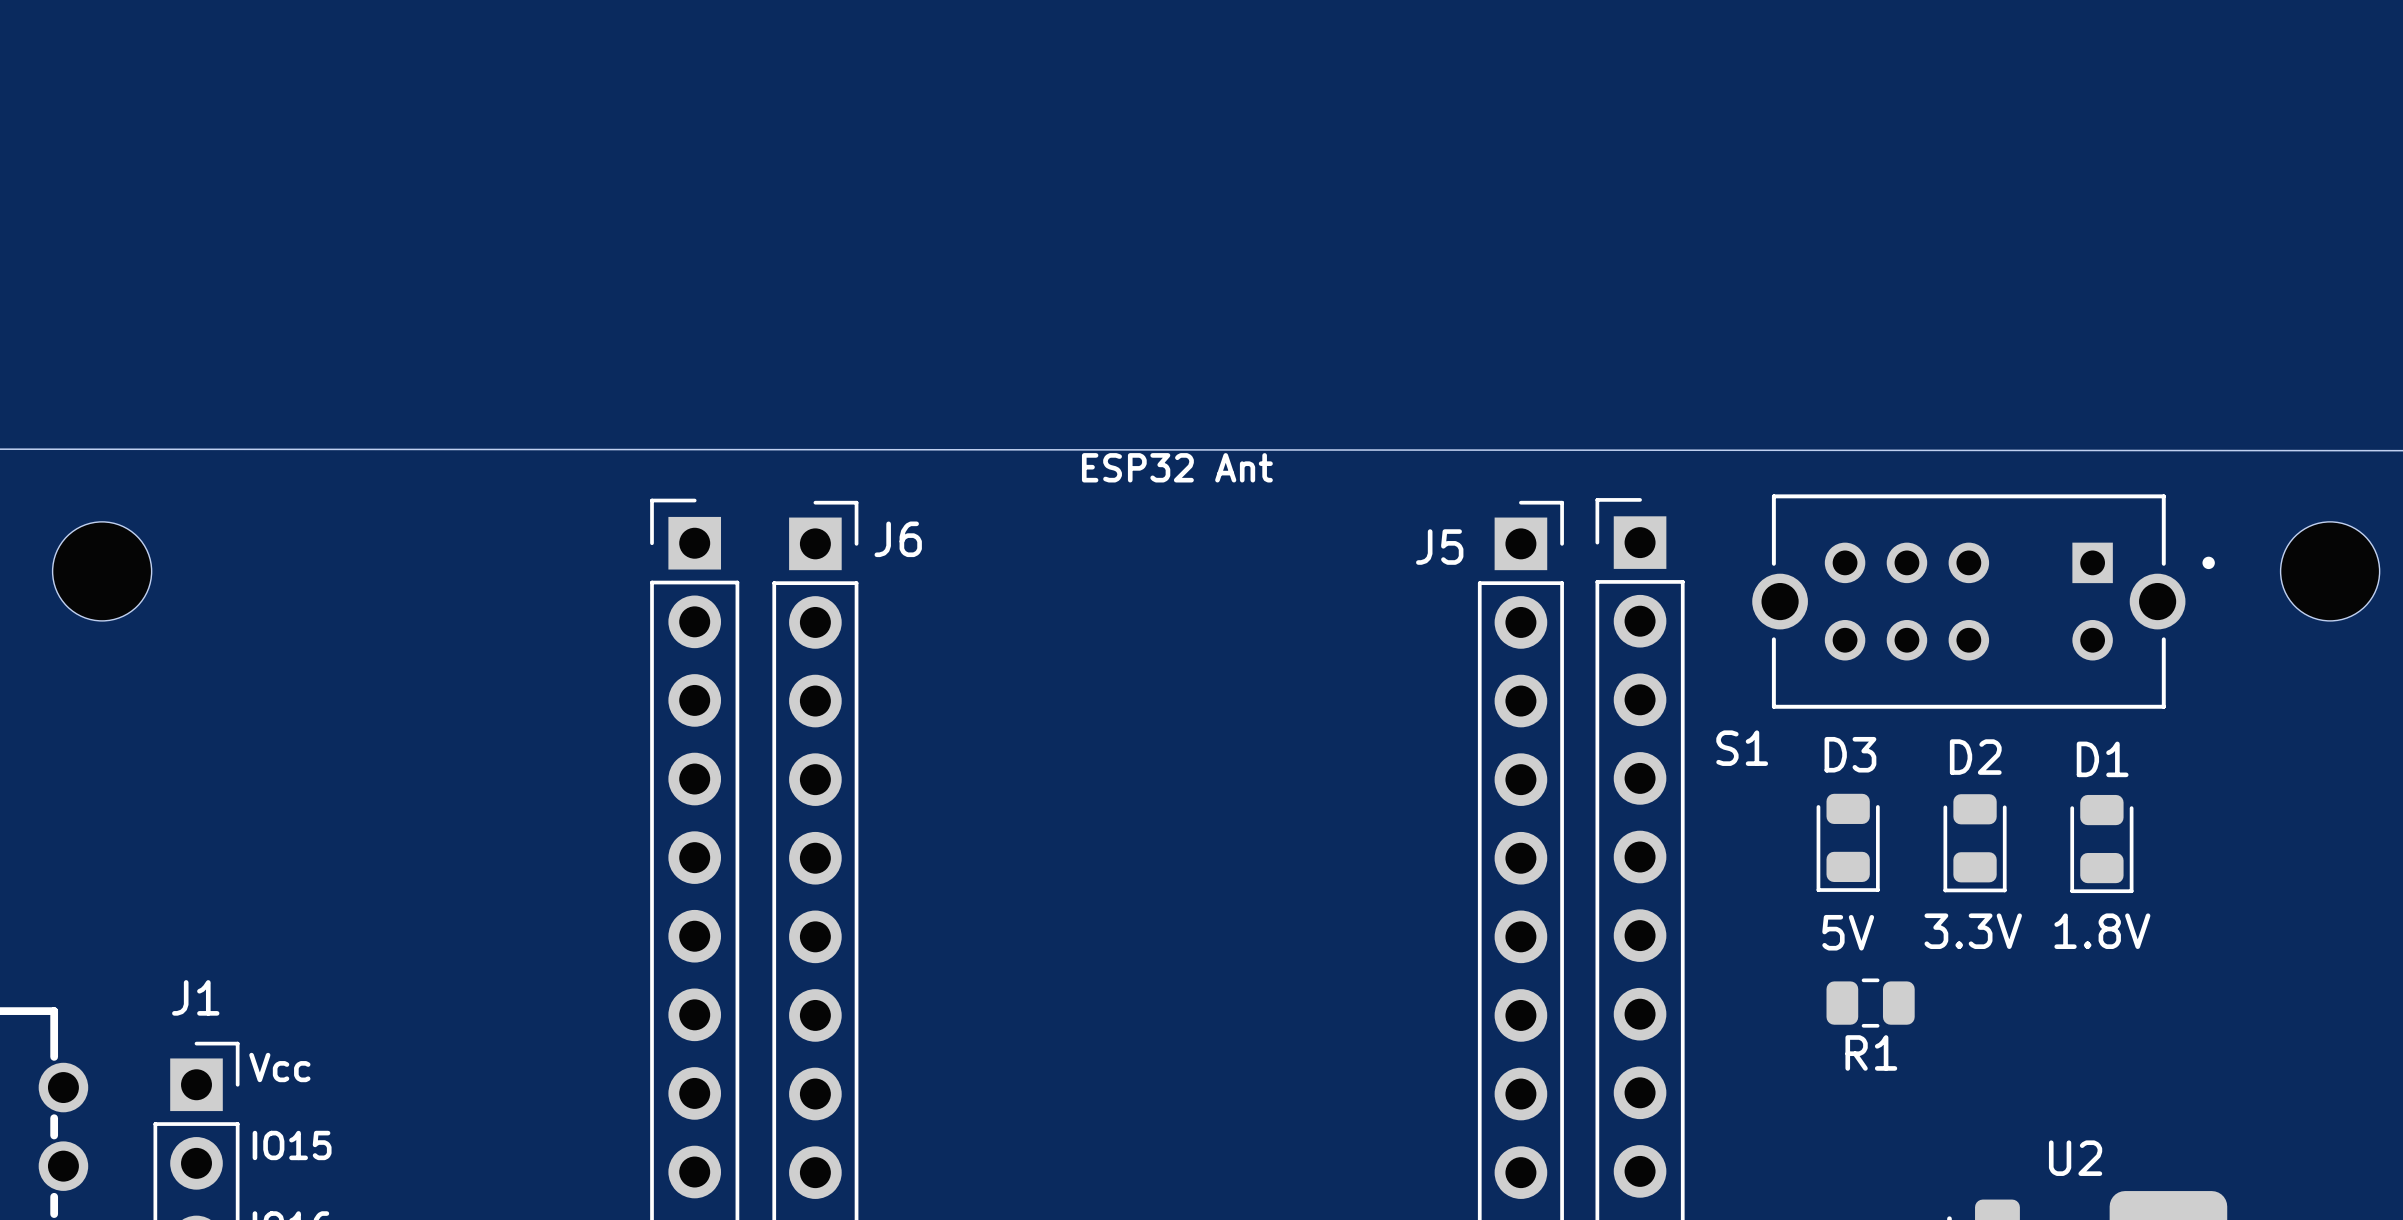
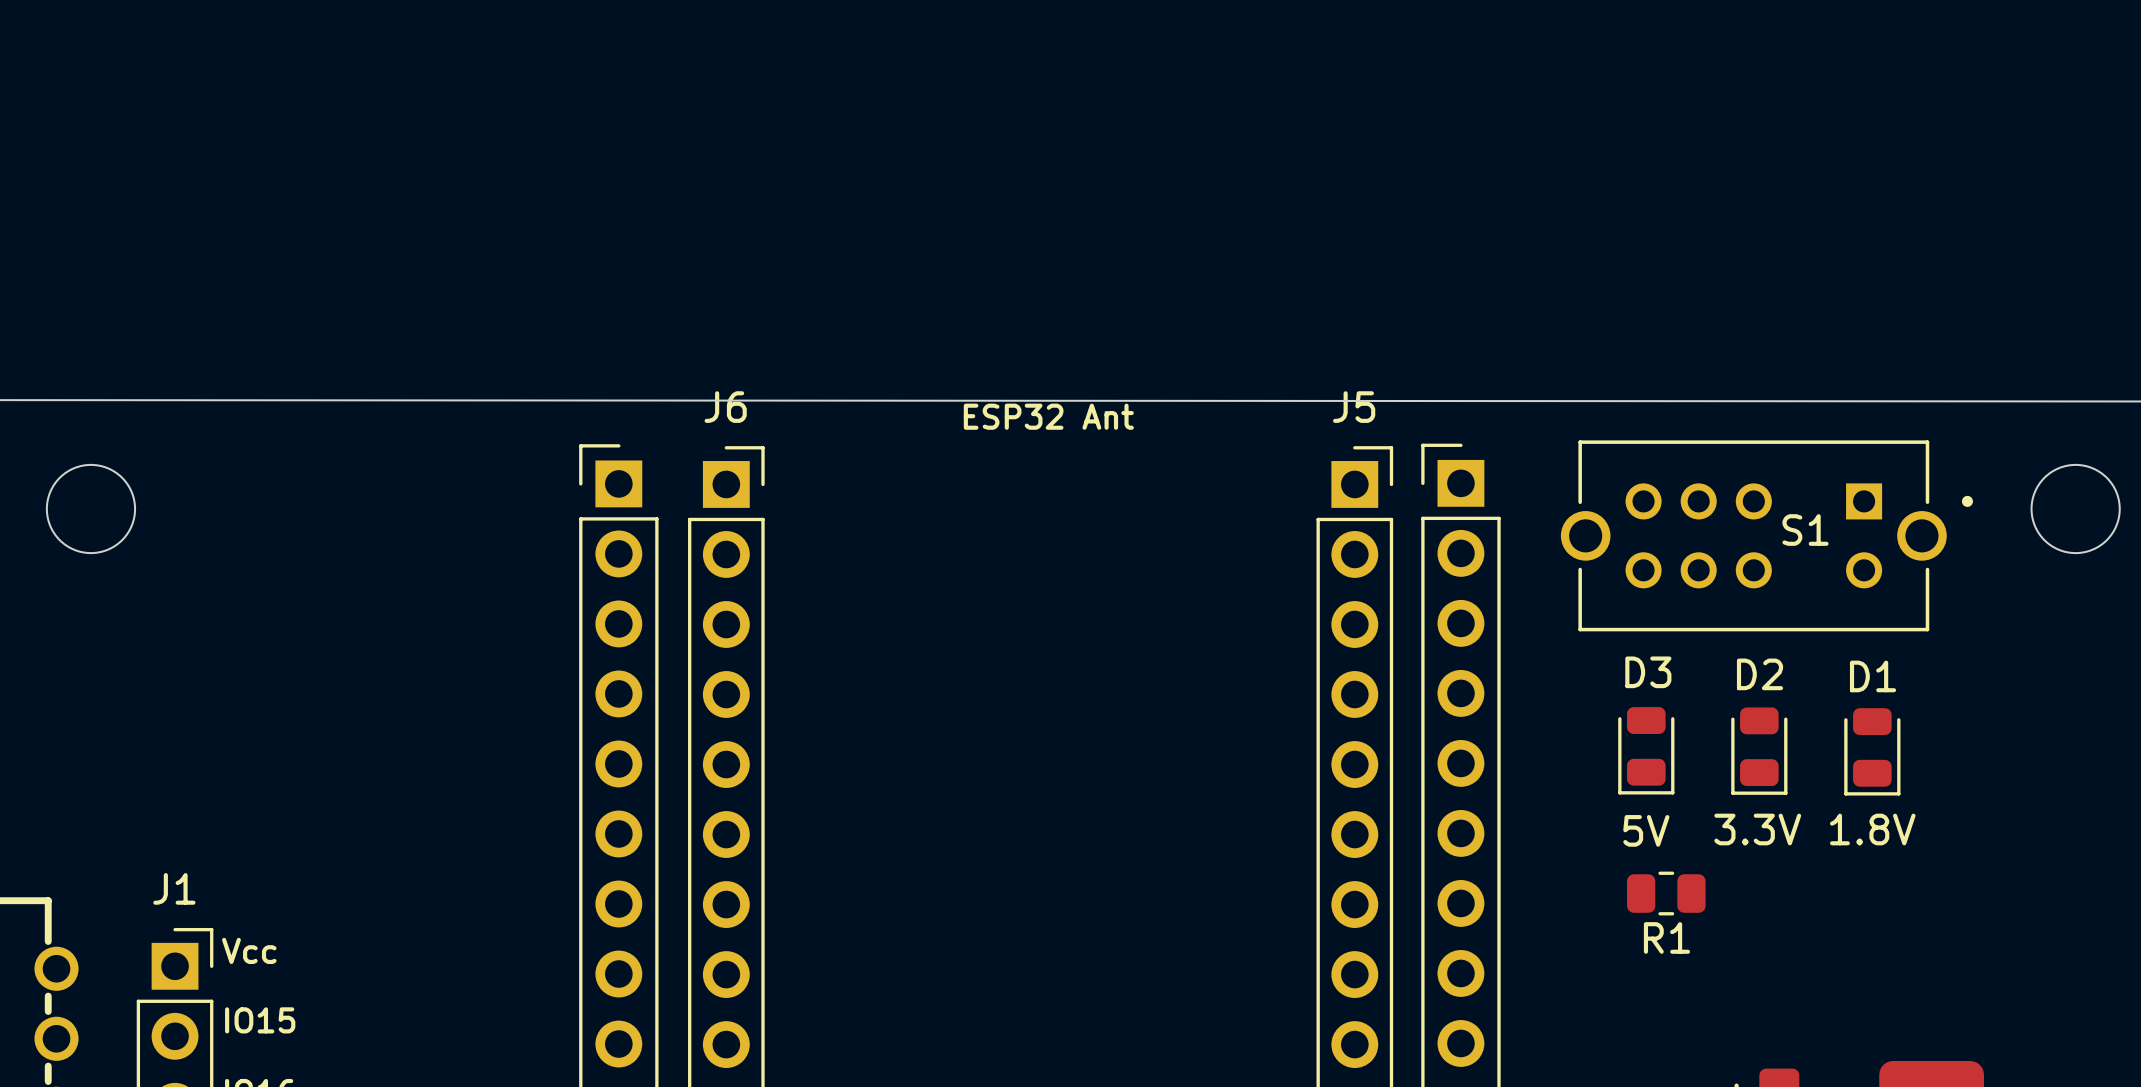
J6 name position: J6 (898, 539) -> J6 (725, 407)
J5 name position: J5 (1439, 547) -> J5 (1354, 407)
S1 name position: S1 (1742, 748) -> S1 (1805, 530)
U2 name: U2 (2075, 1158) -> none

